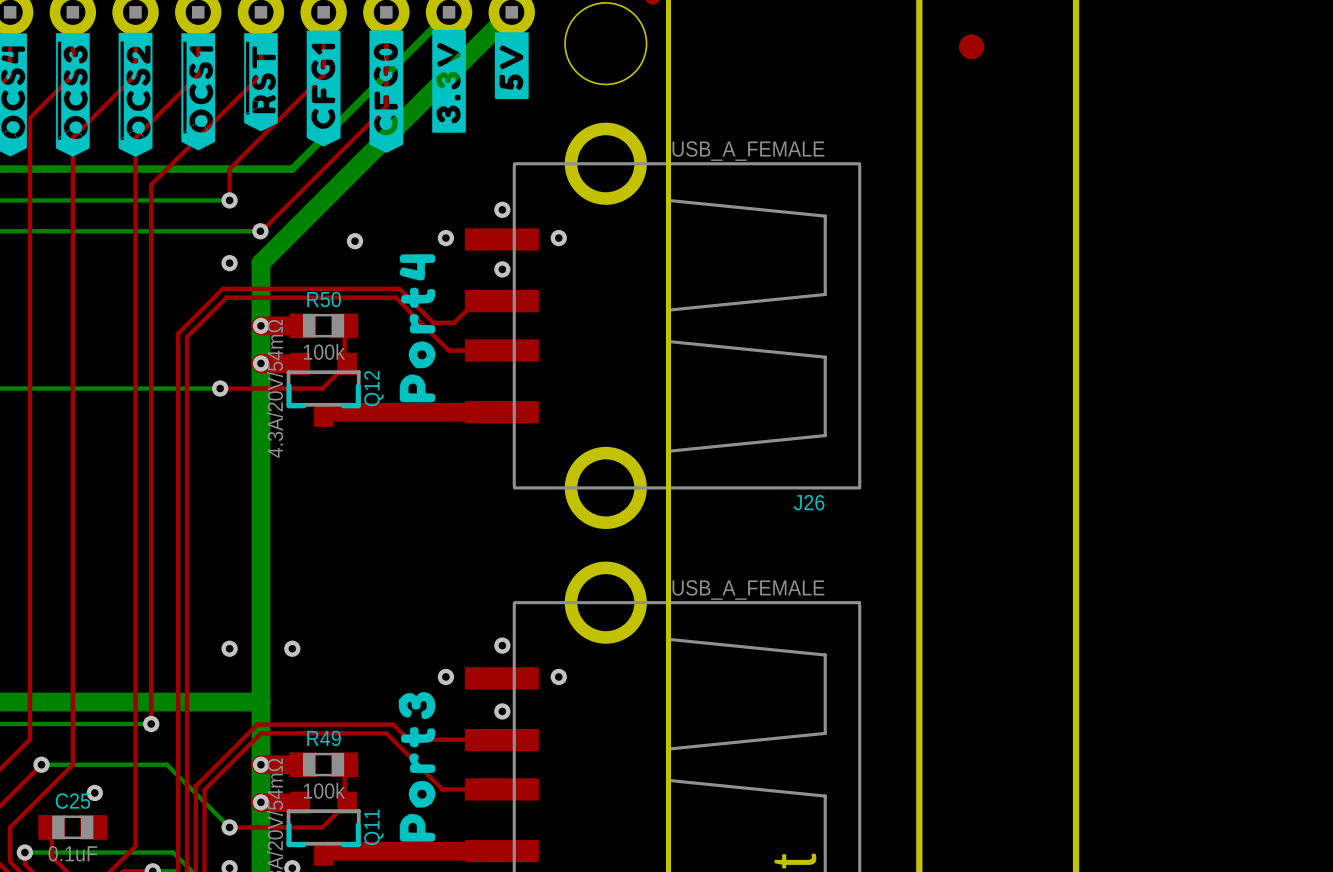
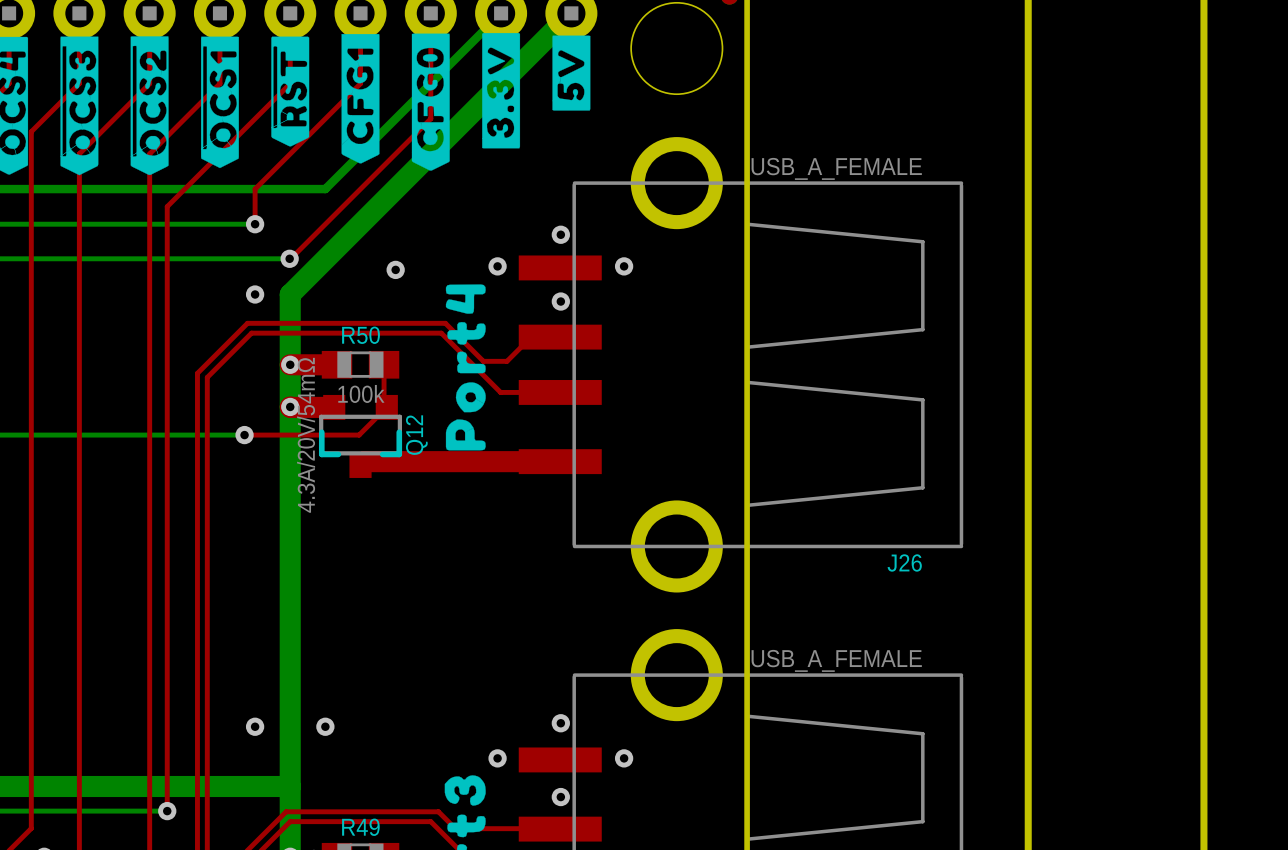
part: (971, 46) -> none

